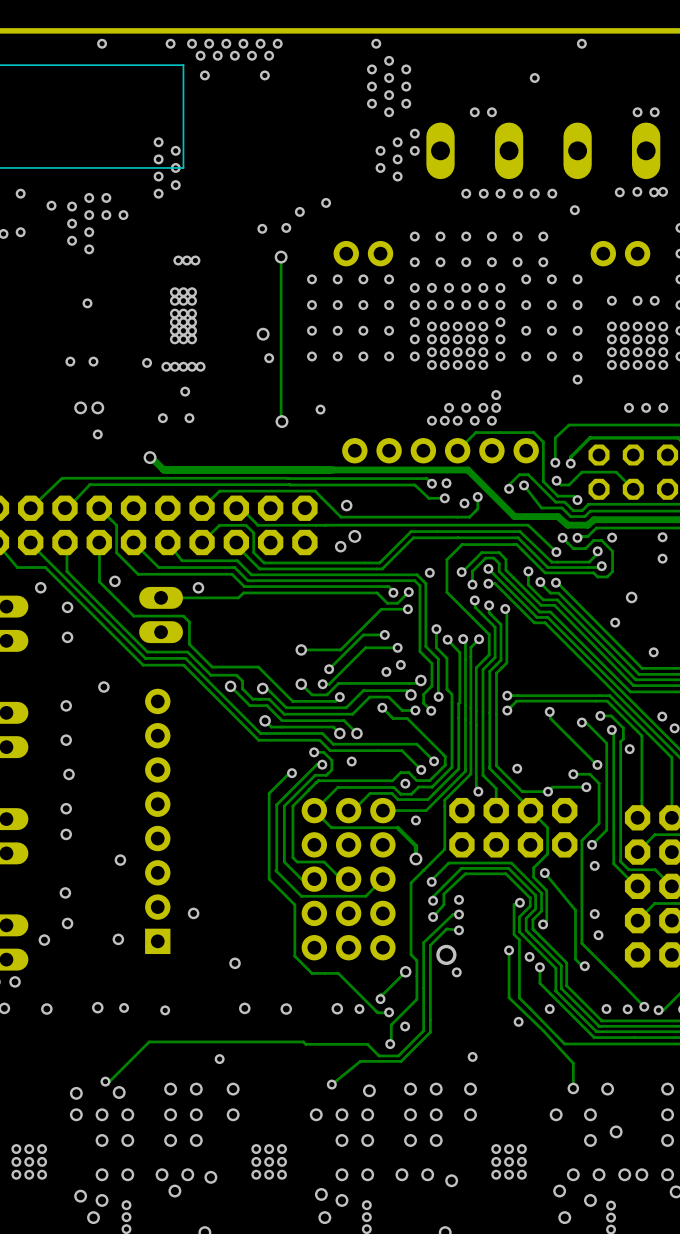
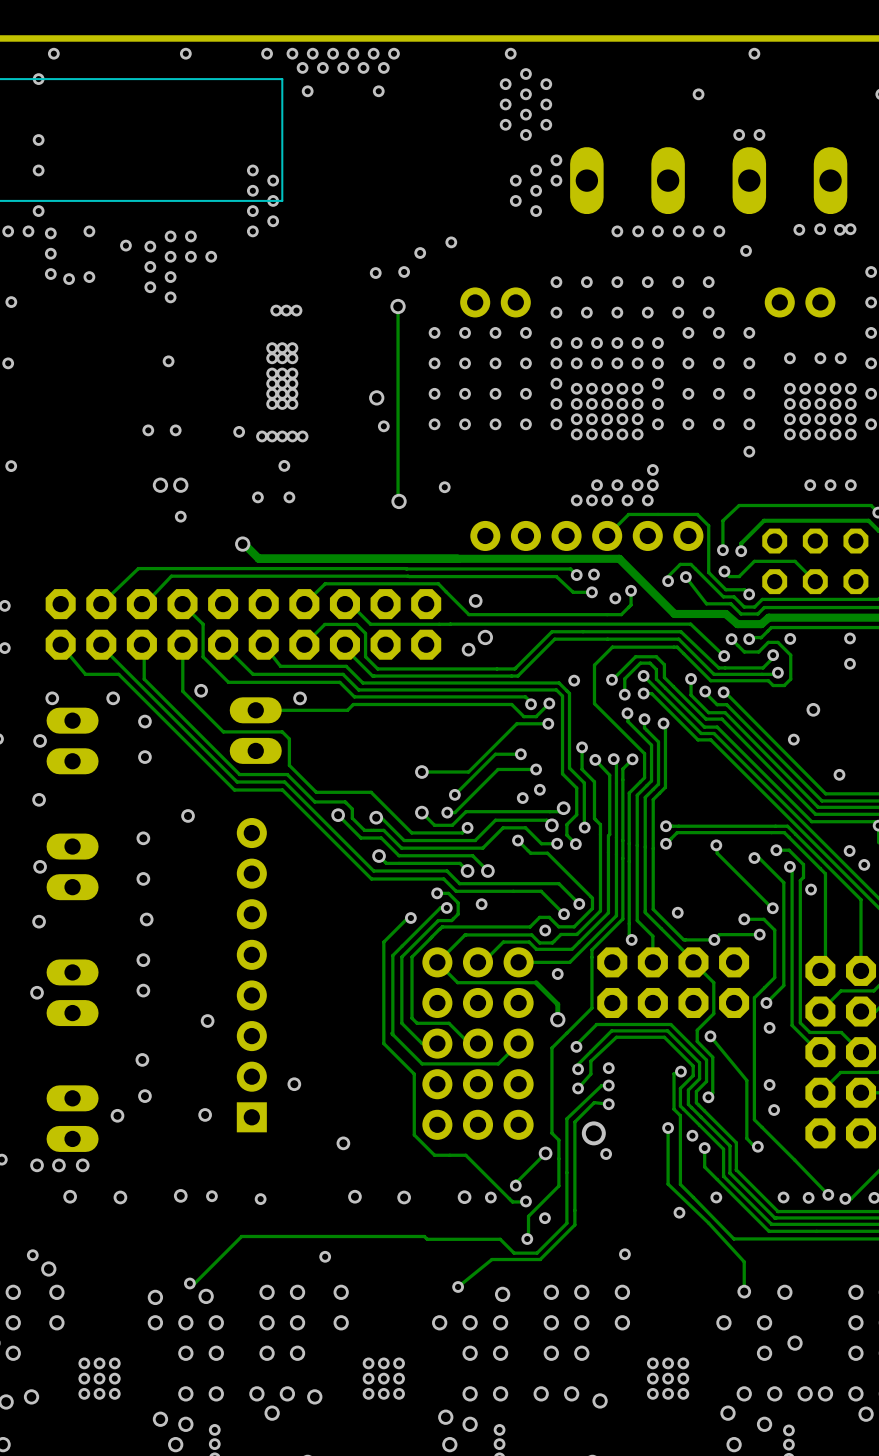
via: (474, 112) -> none
via: (491, 112) -> none
via: none -> (739, 134)
via: none -> (759, 134)
via: (637, 112) -> none
via: (654, 112) -> none

